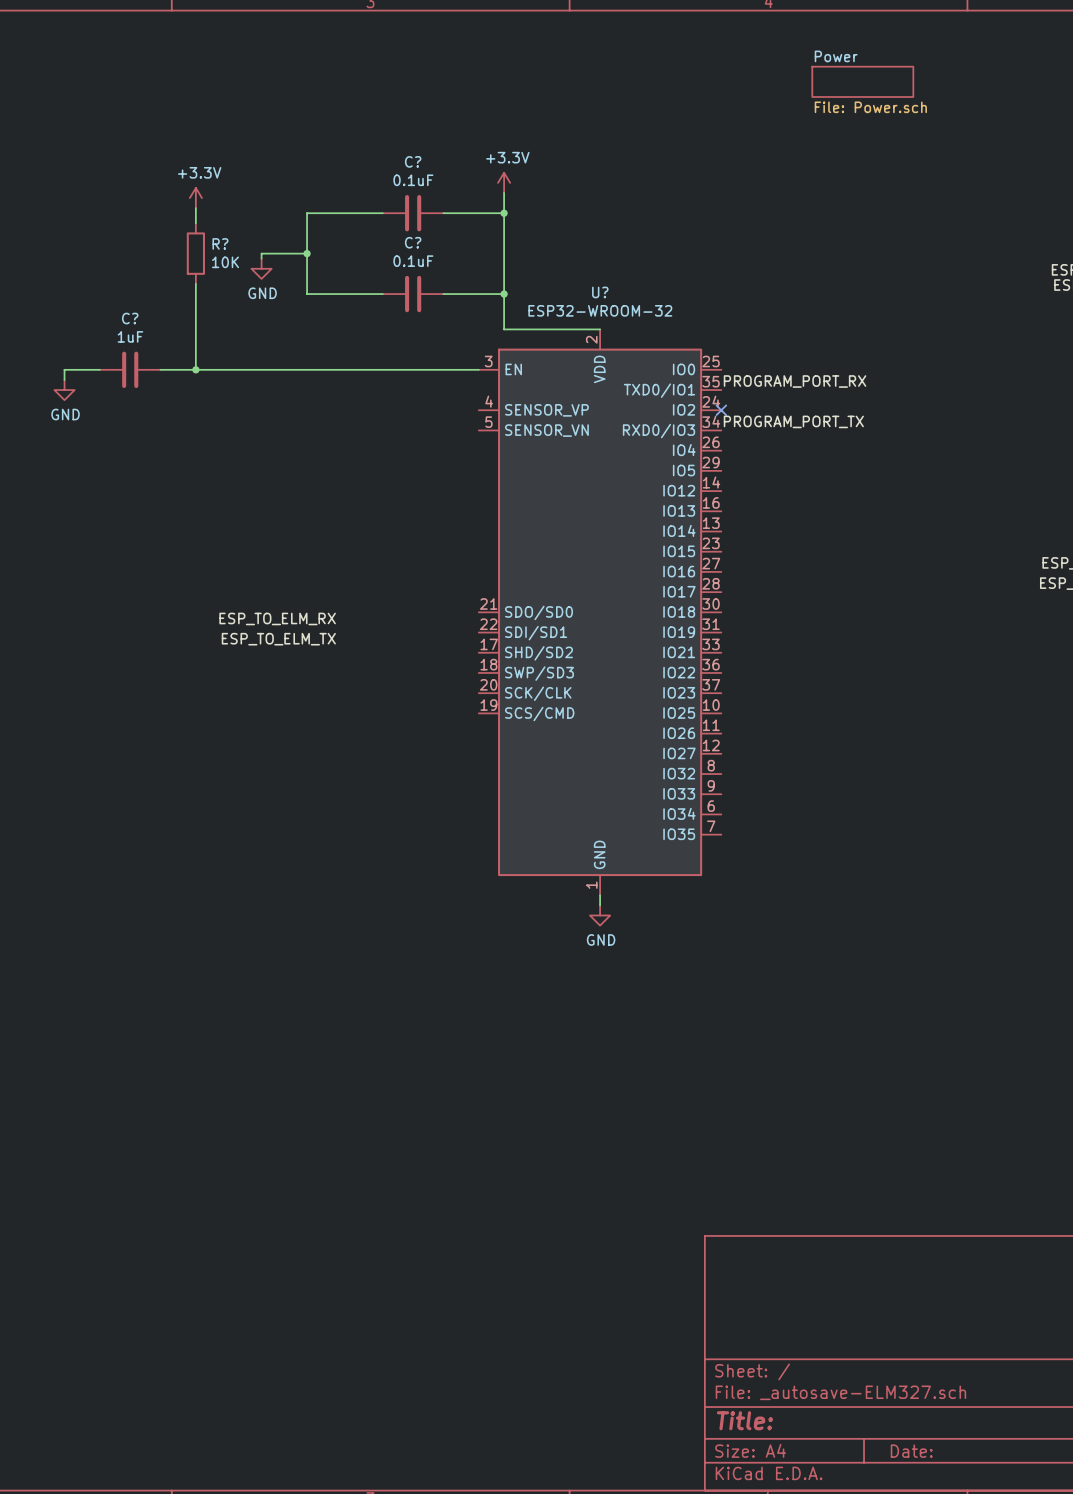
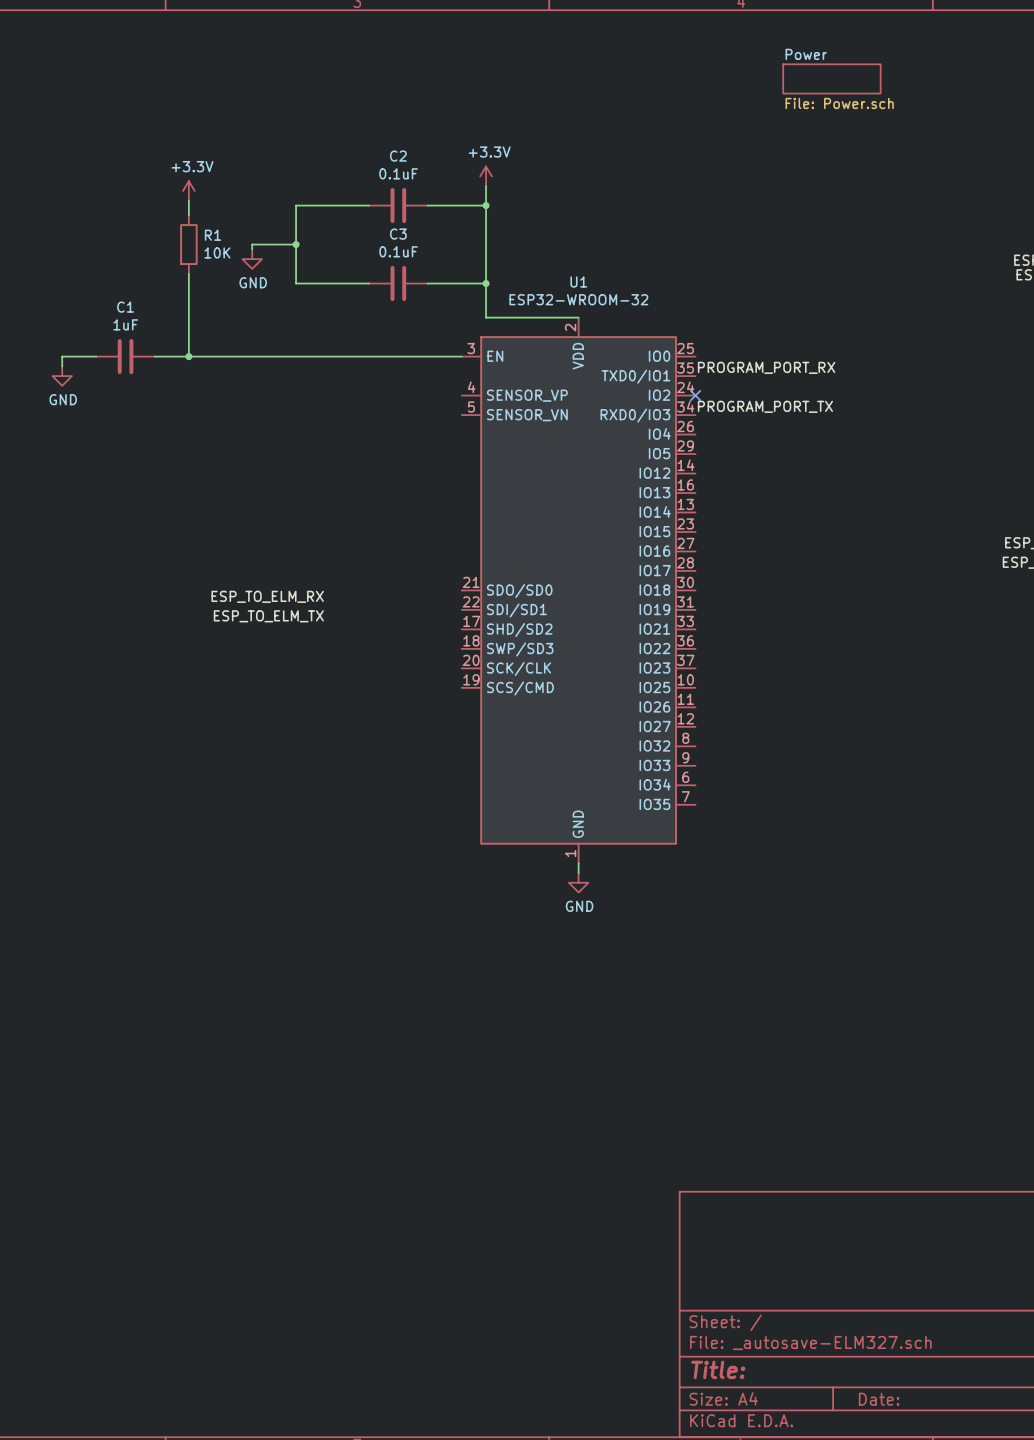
C? name: C? (413, 161) -> C2 (398, 156)
C? name: C? (413, 242) -> C3 (398, 234)
R? name: R? (220, 243) -> R1 (213, 235)
U? name: U? (600, 292) -> U1 (578, 281)
C? name: C? (130, 318) -> C1 (125, 307)

